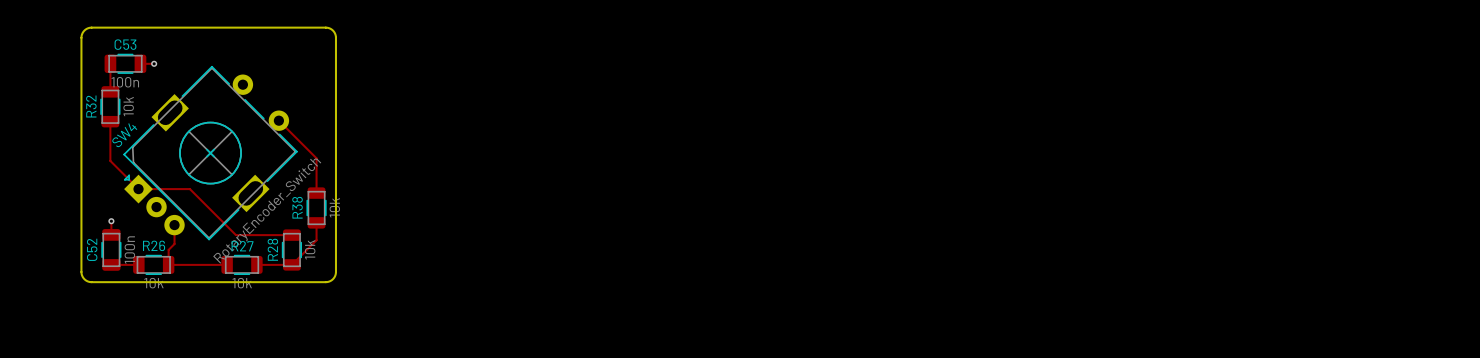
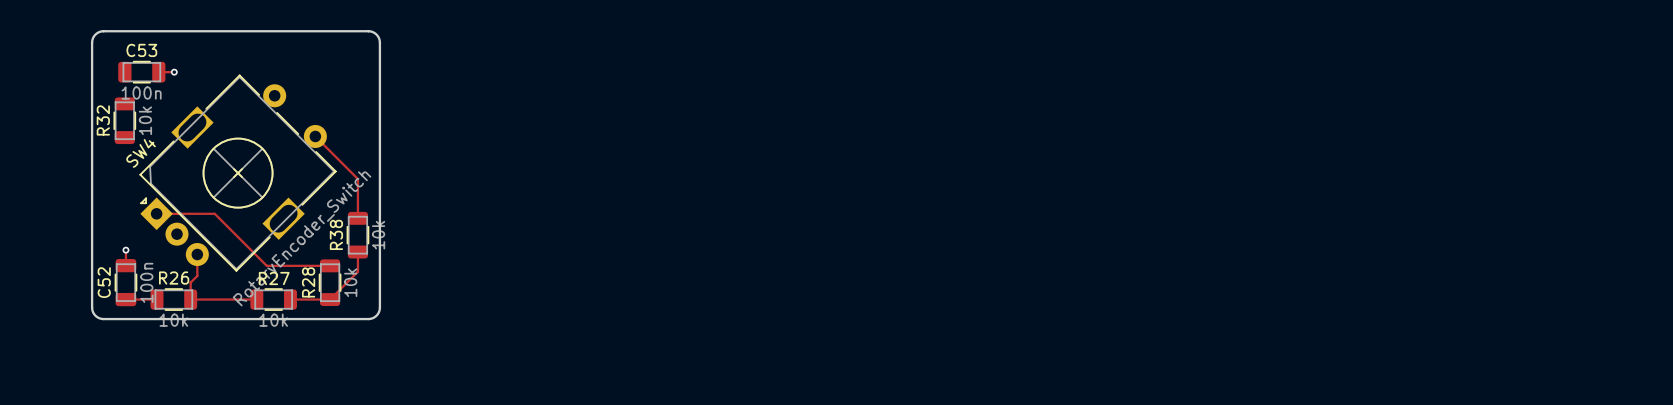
track: (110, 63) (110, 91) -> none
track: (110, 121) (110, 160) (138, 189) -> none

